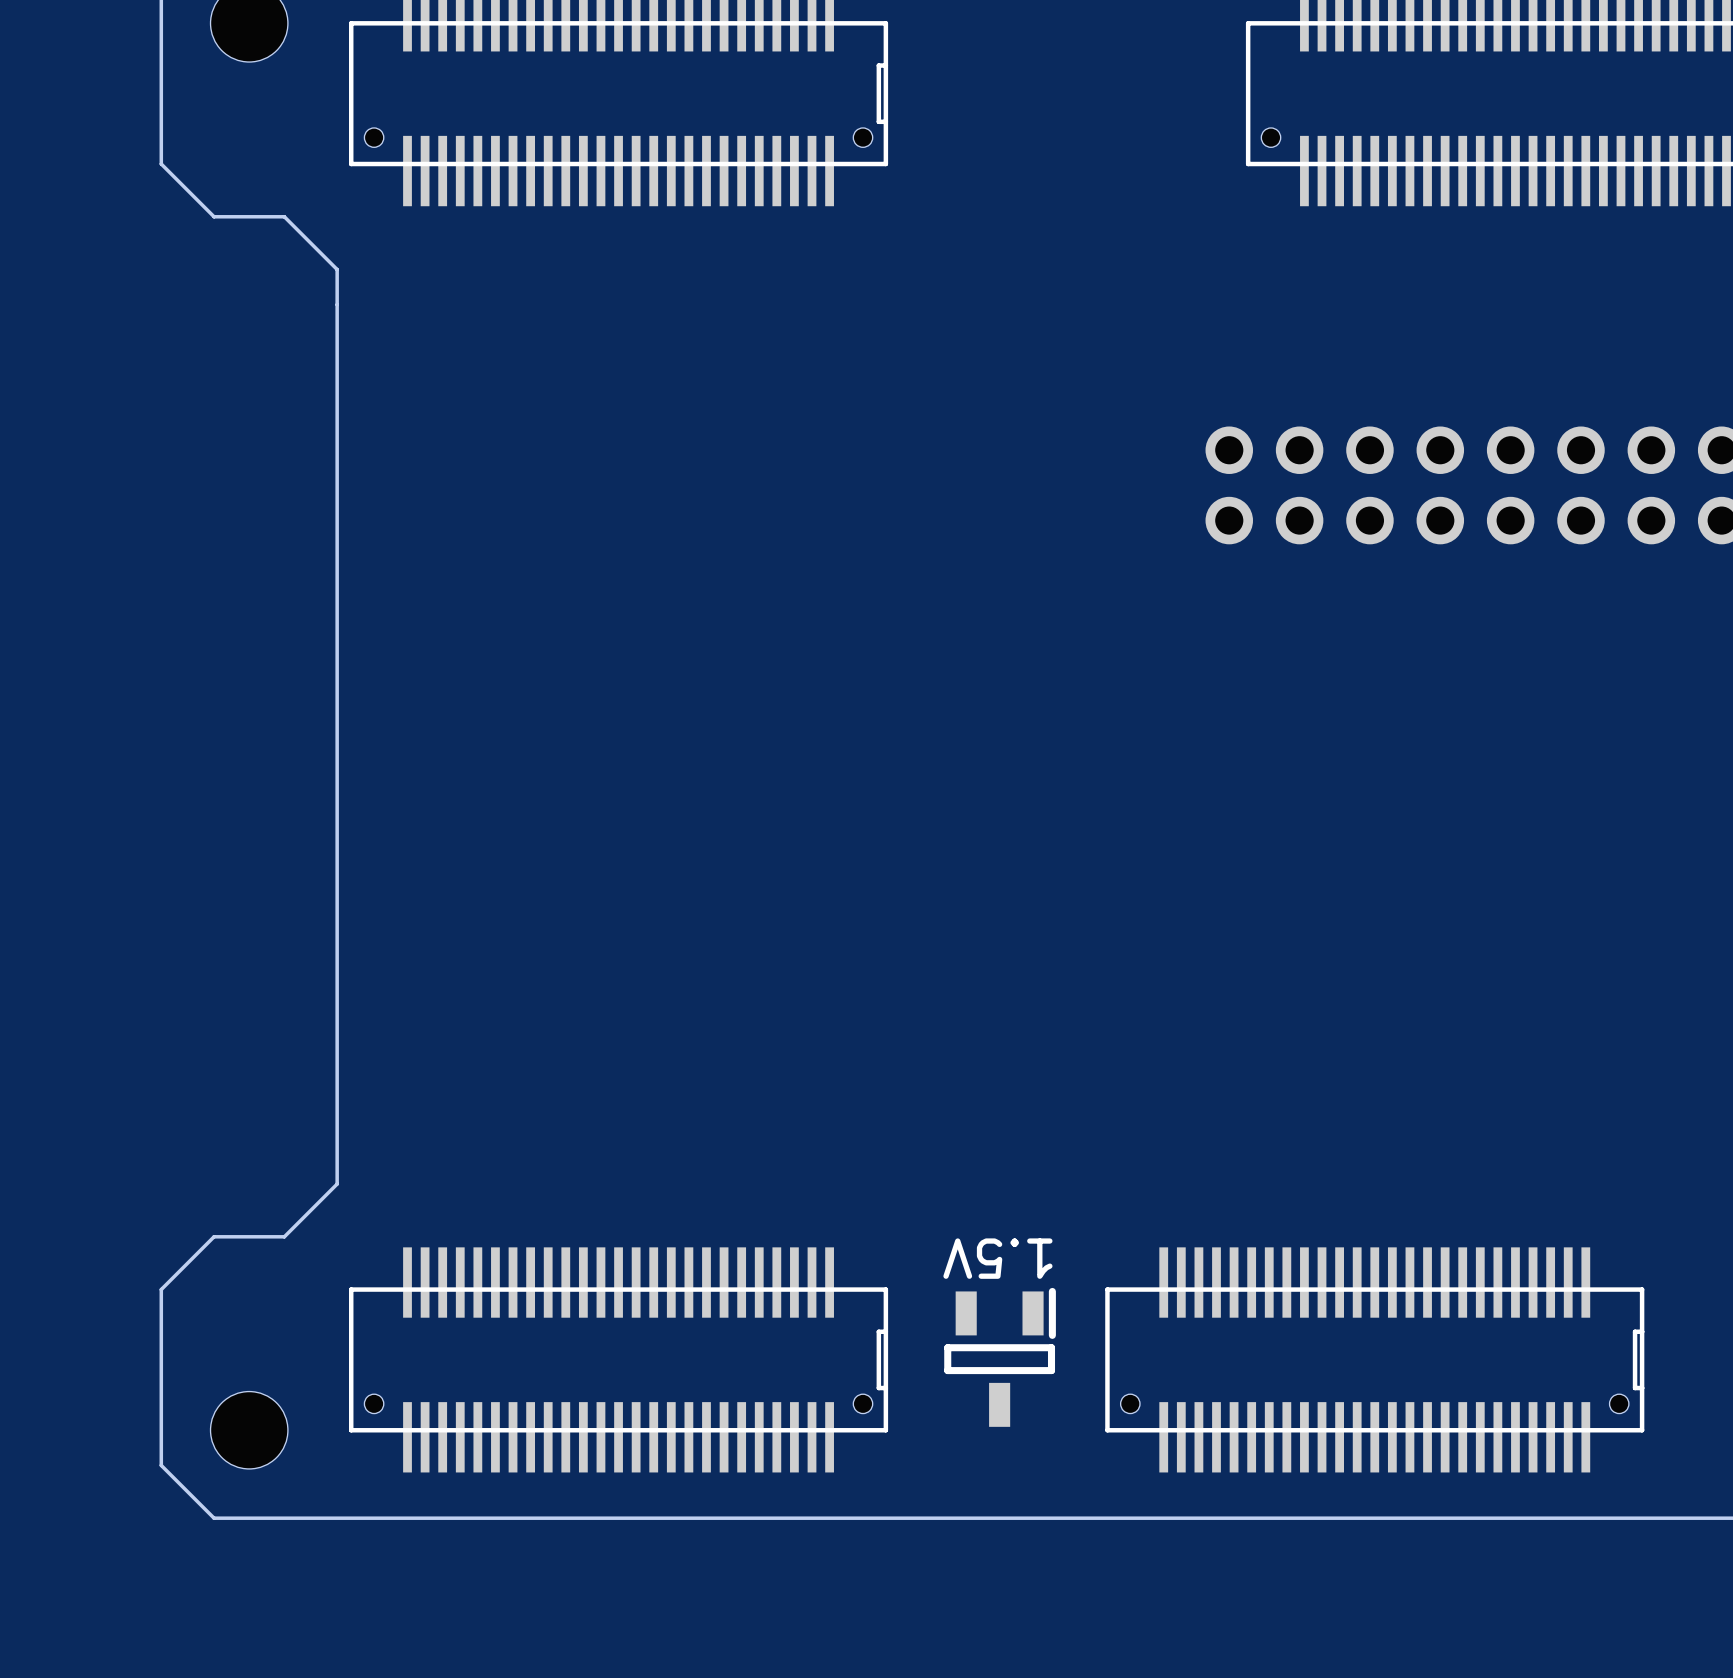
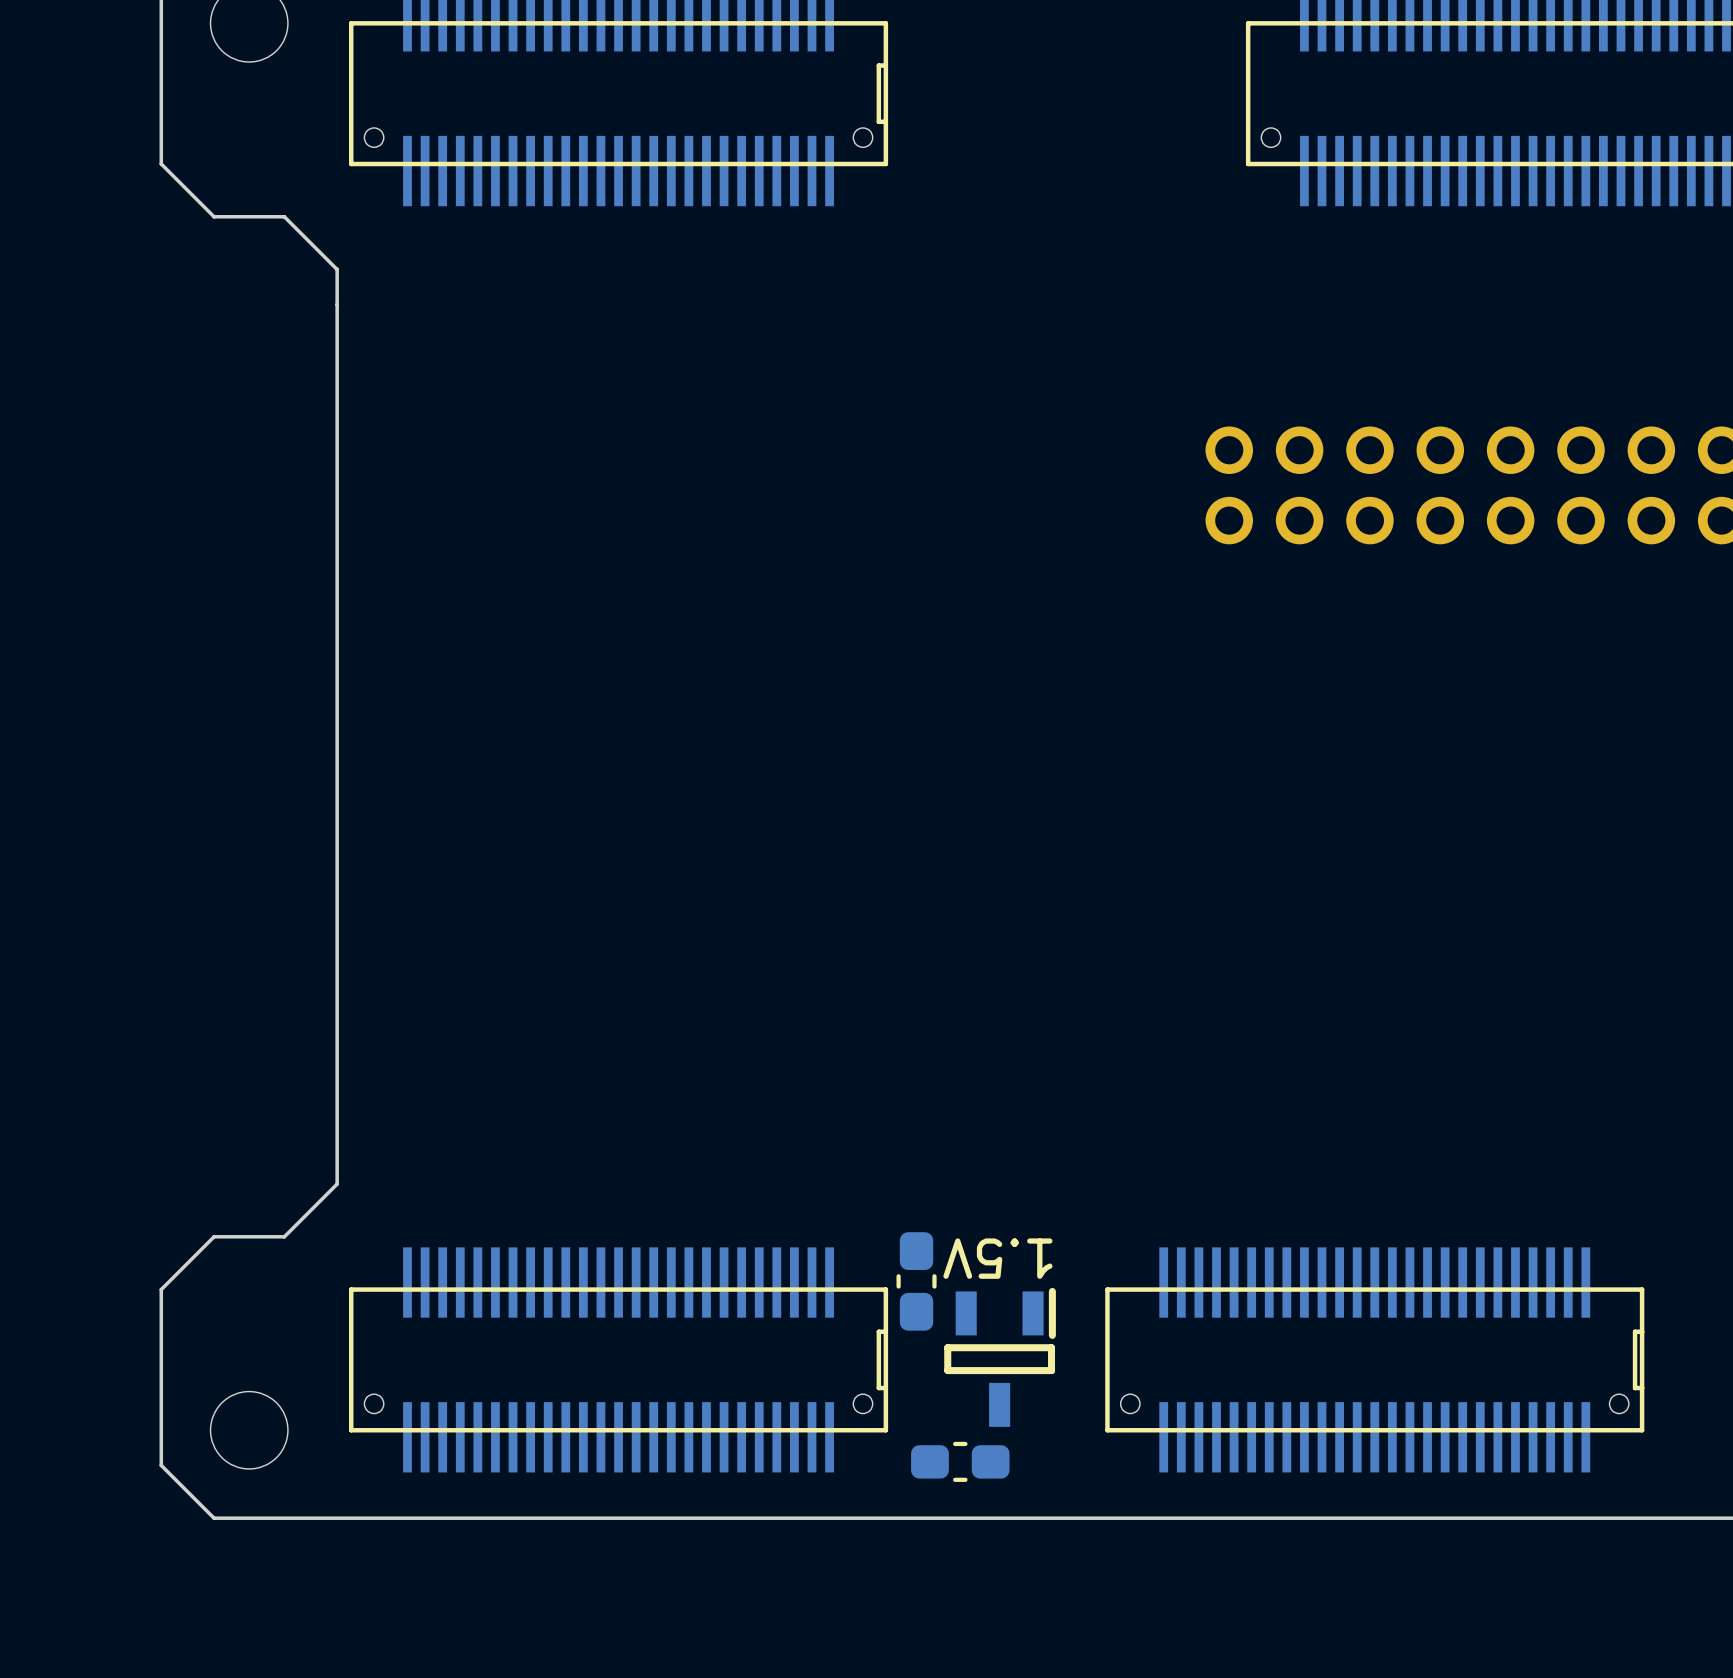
part: none -> (916, 1281)
part: none -> (960, 1461)

